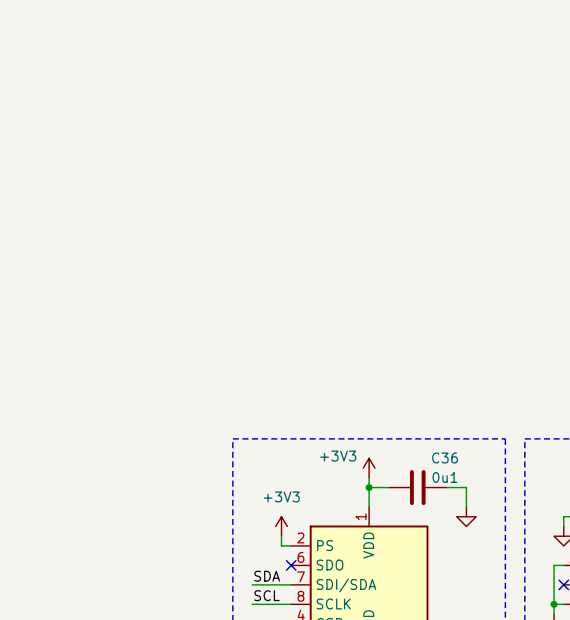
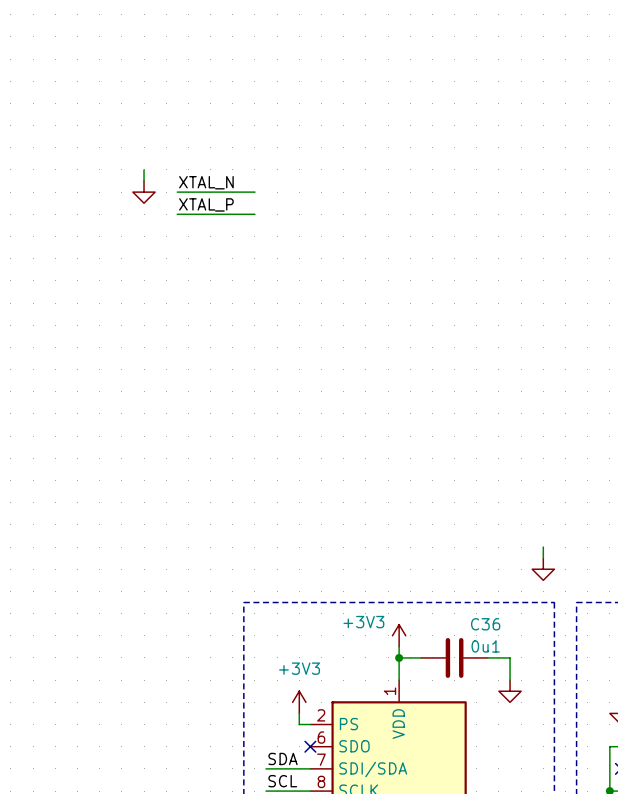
wire: none -> (144, 169) (144, 181)
label: none -> XTAL_N (206, 182)
power symbol: none -> (144, 192)
wire: none -> (177, 192) (254, 192)
label: none -> XTAL_P (206, 204)
wire: none -> (177, 214) (254, 214)
wire: none -> (543, 547) (543, 558)
power symbol: none -> (543, 569)

